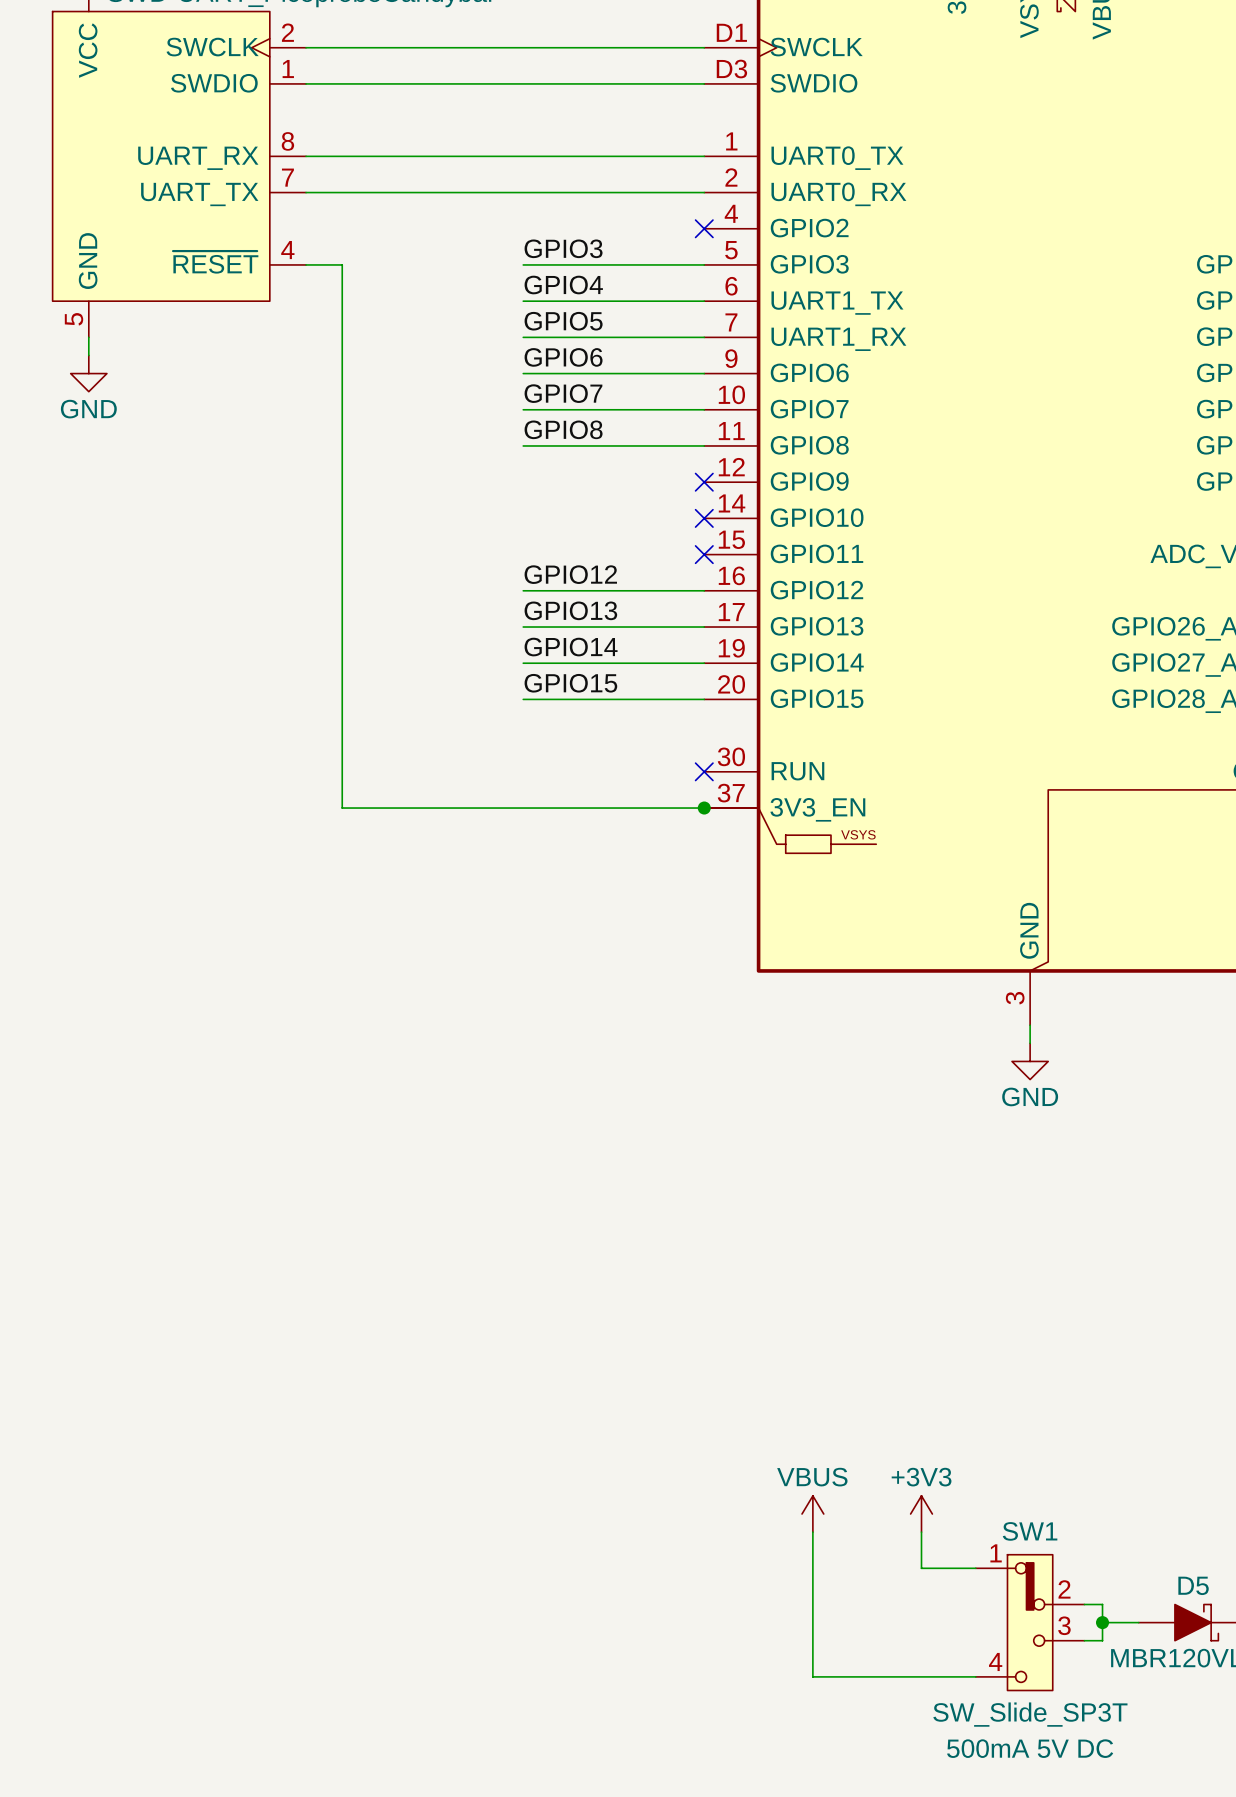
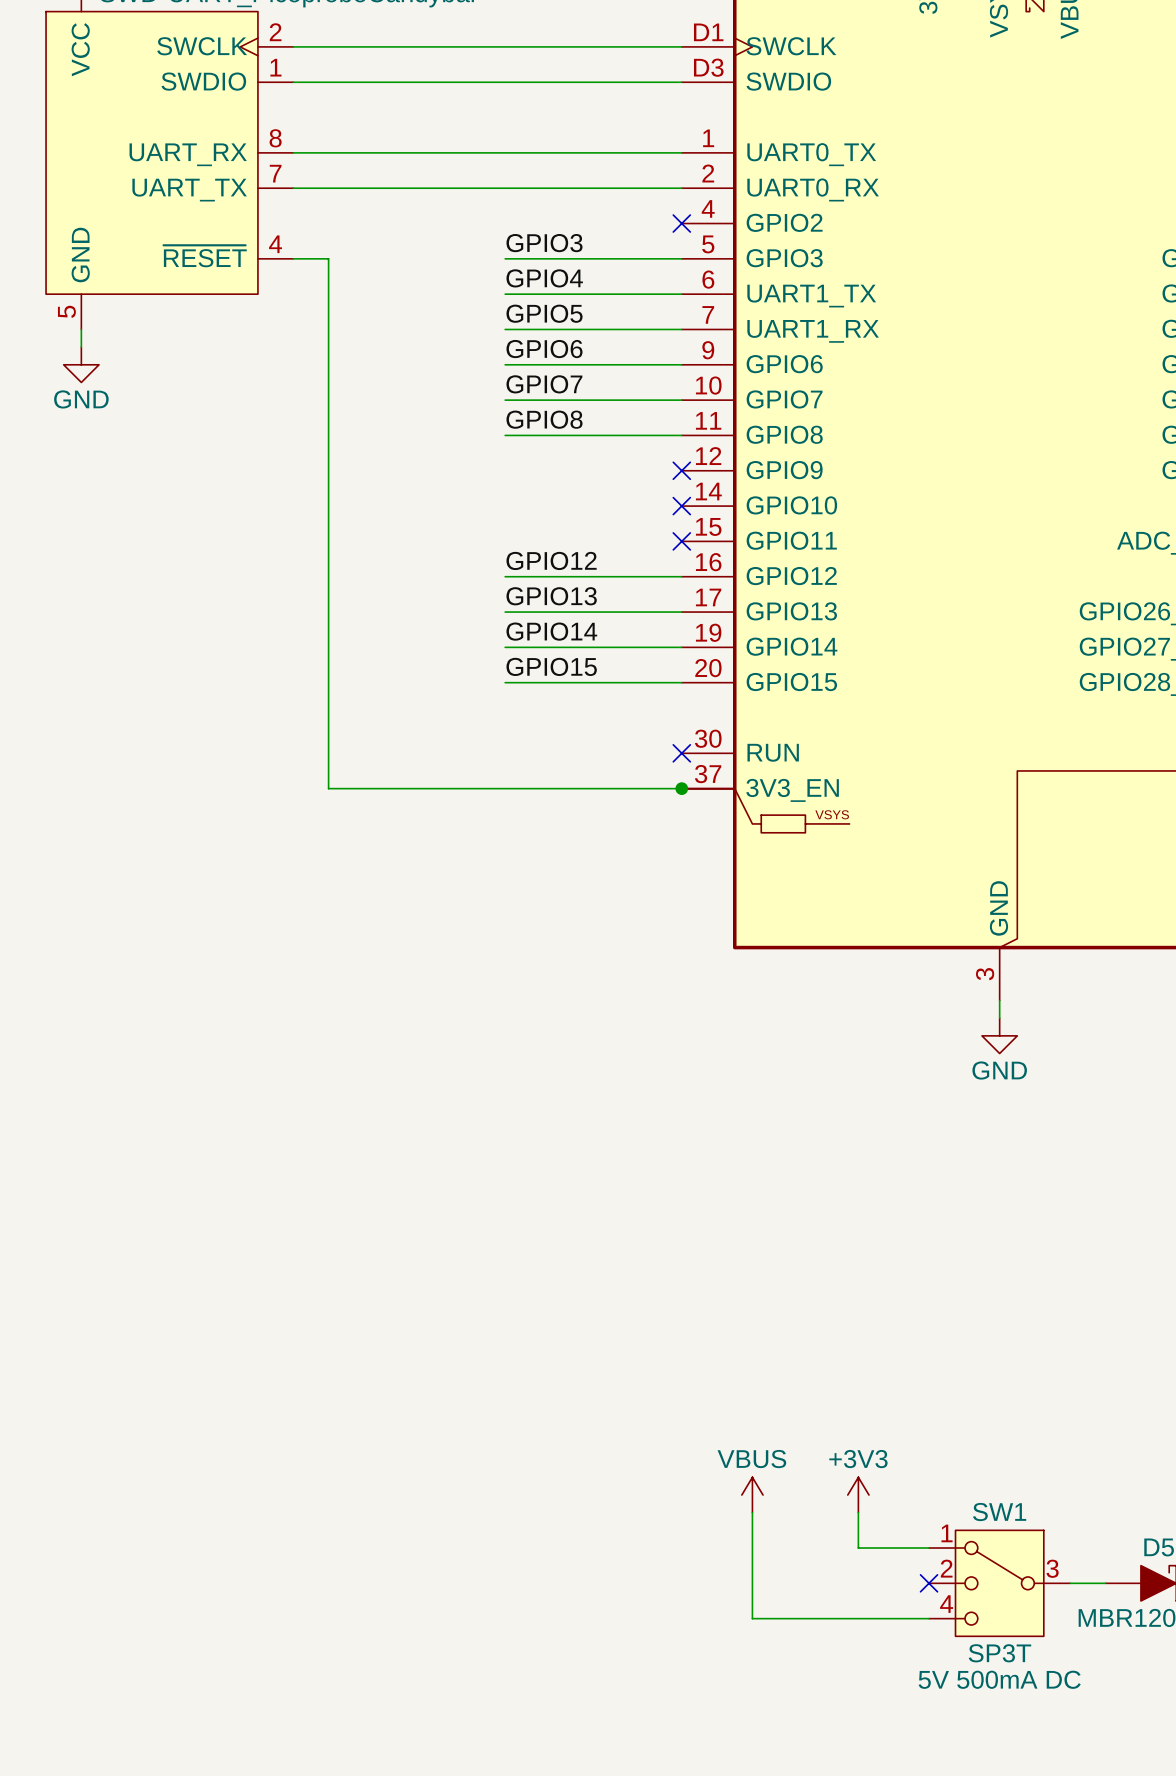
power symbol position: VBUS (812, 1514) -> VBUS (752, 1495)
power symbol position: +3V3 (921, 1514) -> +3V3 (858, 1495)
wire: (812, 1532) (812, 1676) (975, 1676) -> none
wire: (921, 1532) (921, 1568) (975, 1568) -> none
wire: none -> (752, 1512) (752, 1618) (929, 1618)
wire: none -> (858, 1512) (858, 1548) (929, 1548)
SW1 symbol: [975, 1554, 1085, 1691] -> [929, 1530, 1071, 1637]
wire: (1084, 1604) (1102, 1604) (1102, 1640) (1084, 1640) -> none
no-connect mark: none -> (929, 1583)
junction: (1102, 1622) -> none
SW1 value: SW_Slide_SP3T (1030, 1714) -> SP3T (999, 1653)
SW1 text: none -> 5V 500mA DC (999, 1679)
SW1 text: 500mA 5V DC (1030, 1748) -> none

